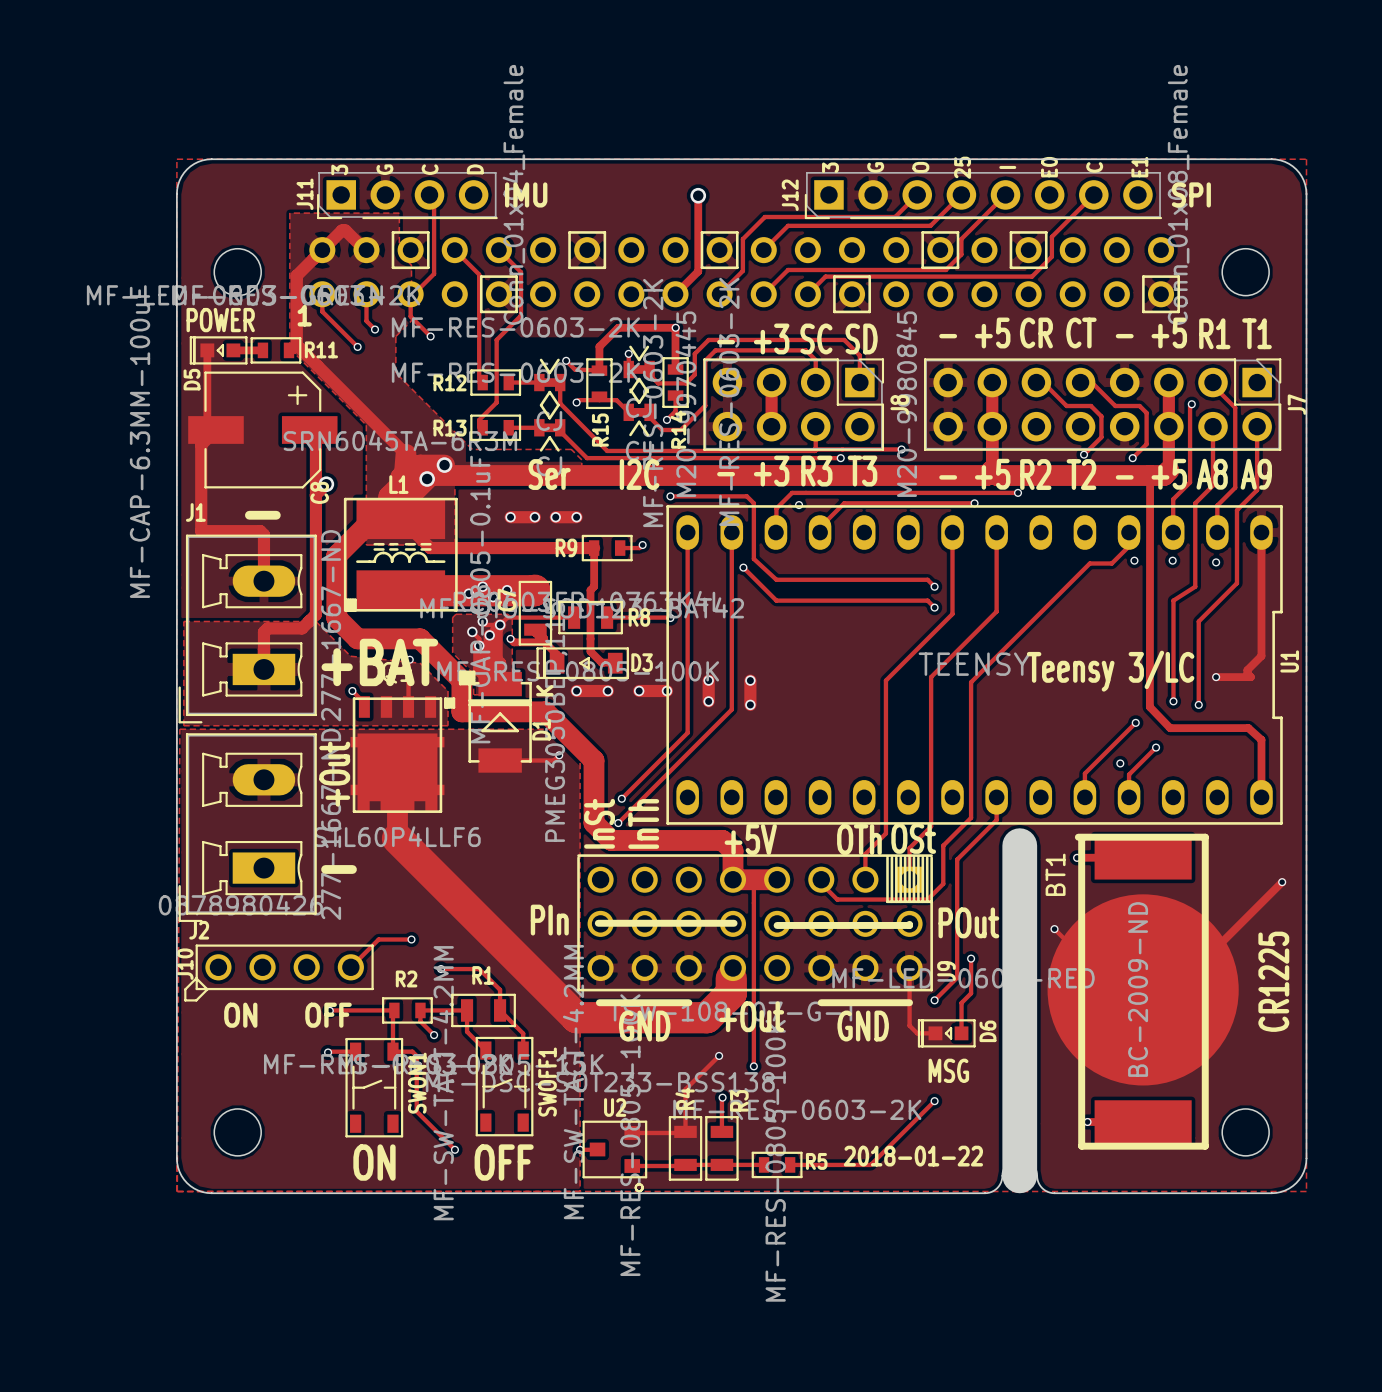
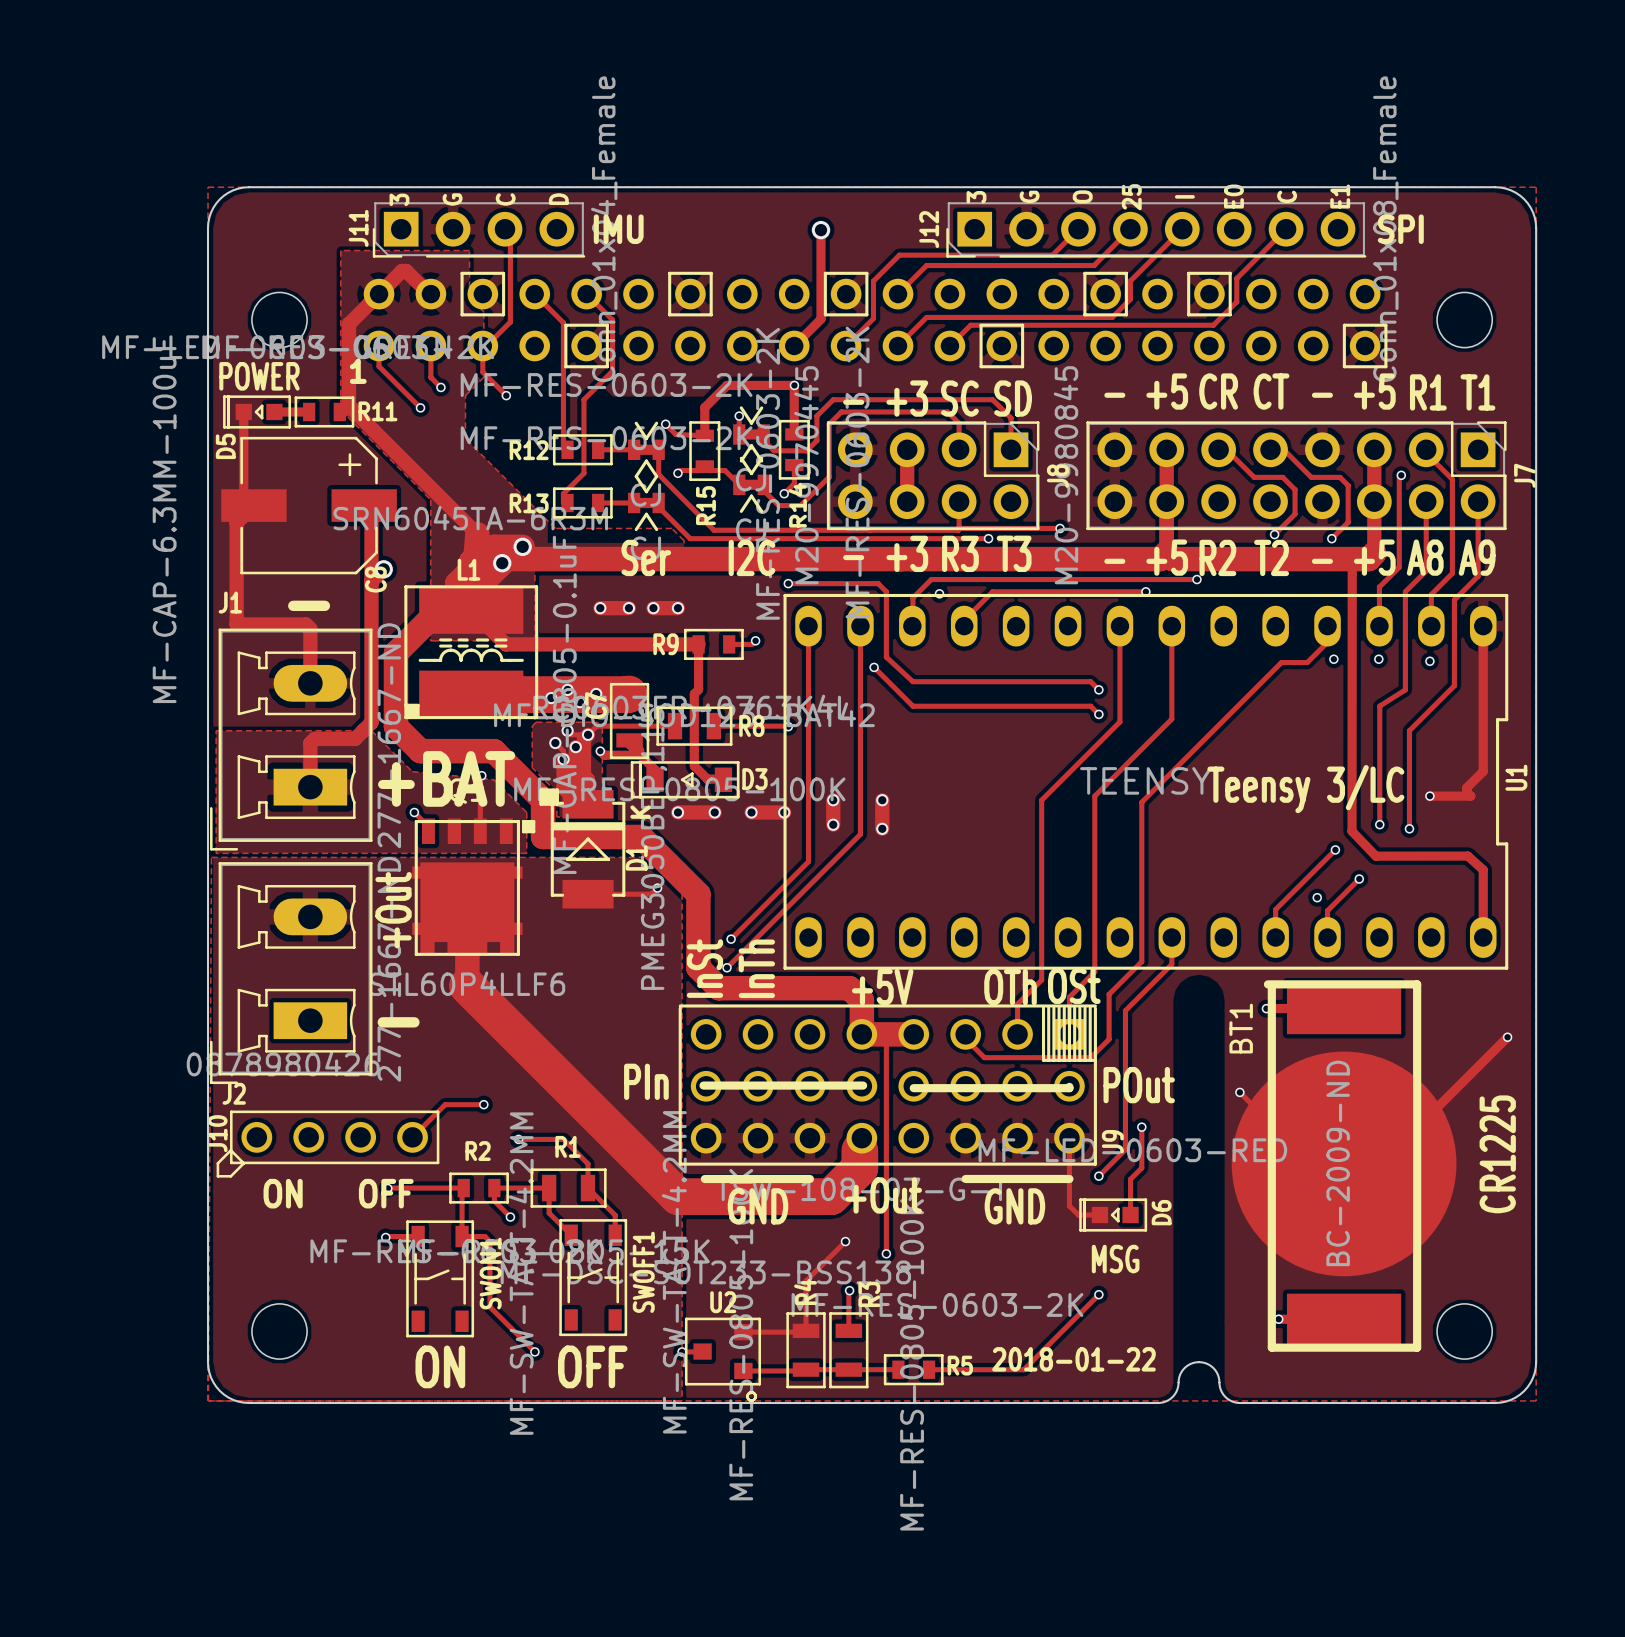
board edge: (1019, 845) (1019, 1175) -> none

